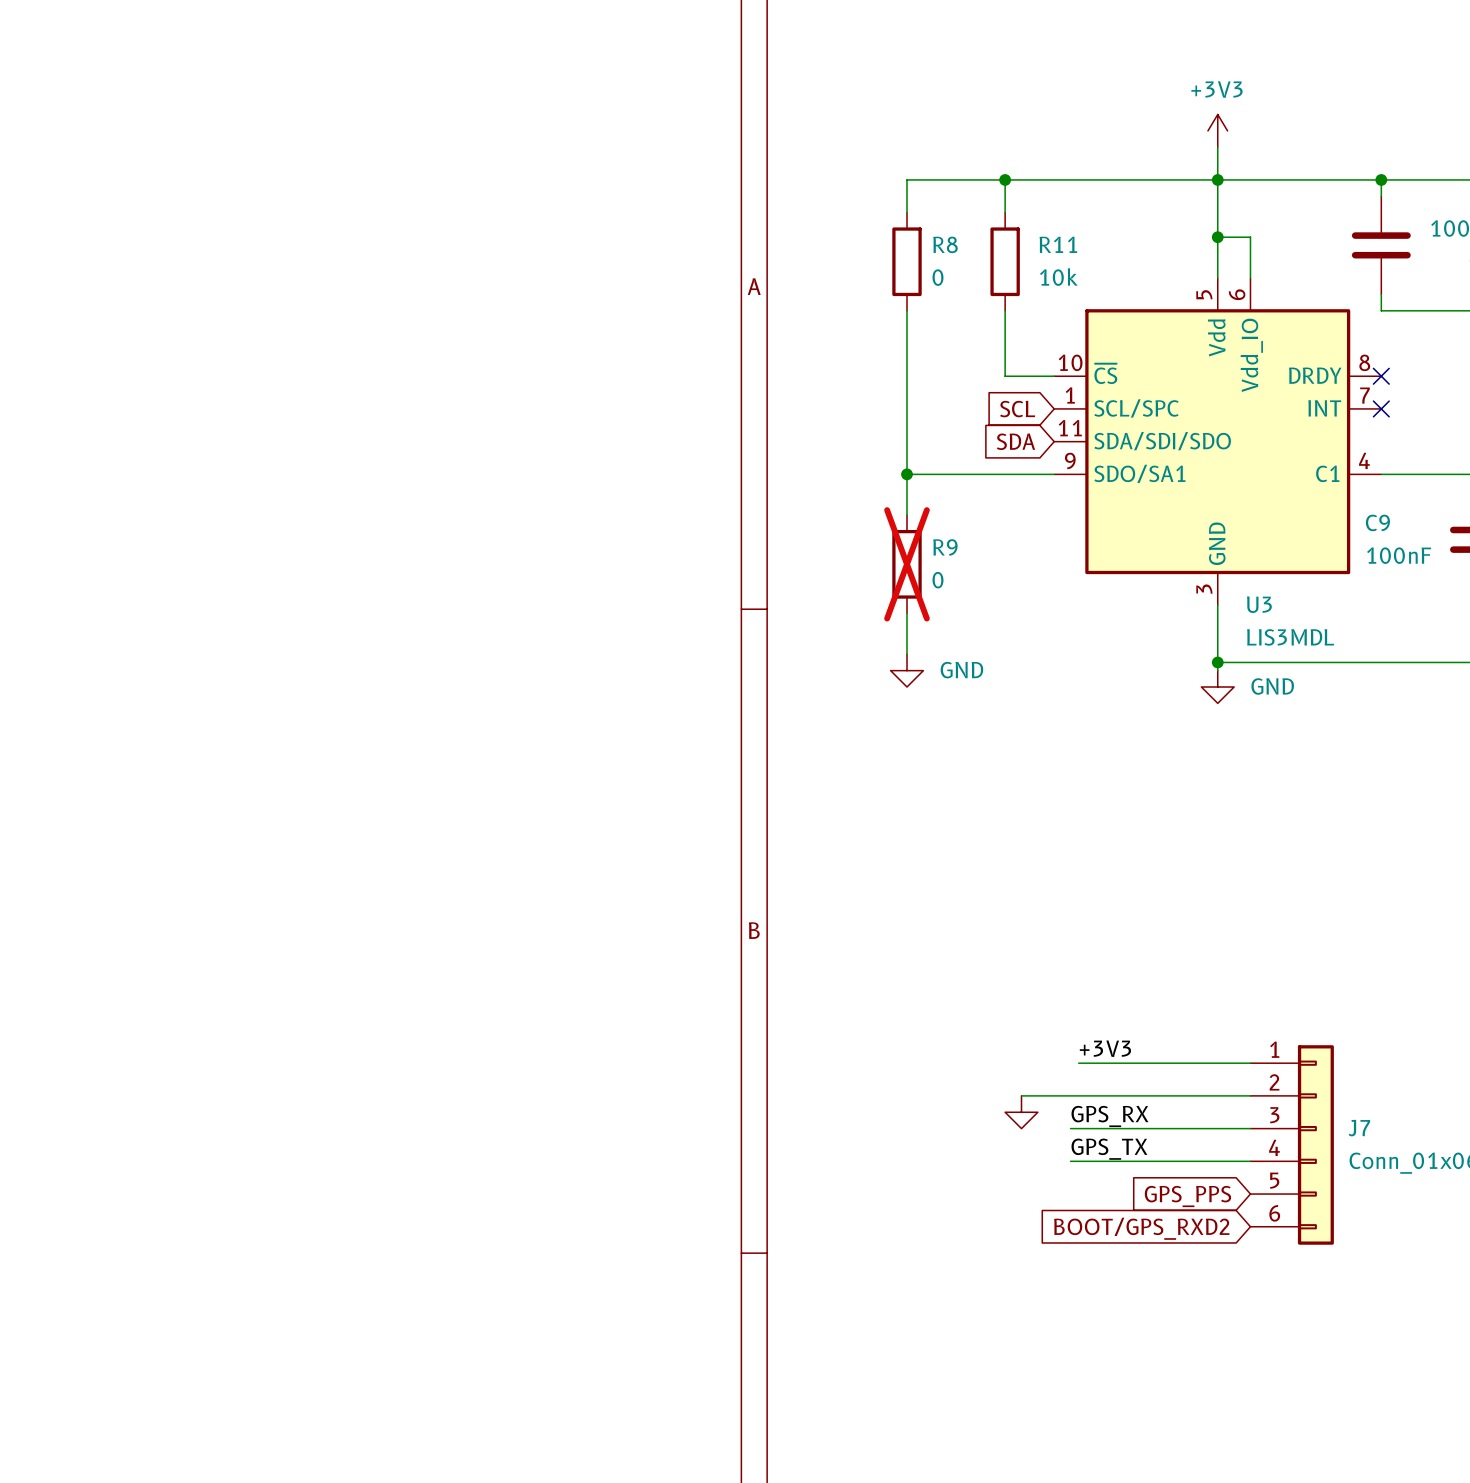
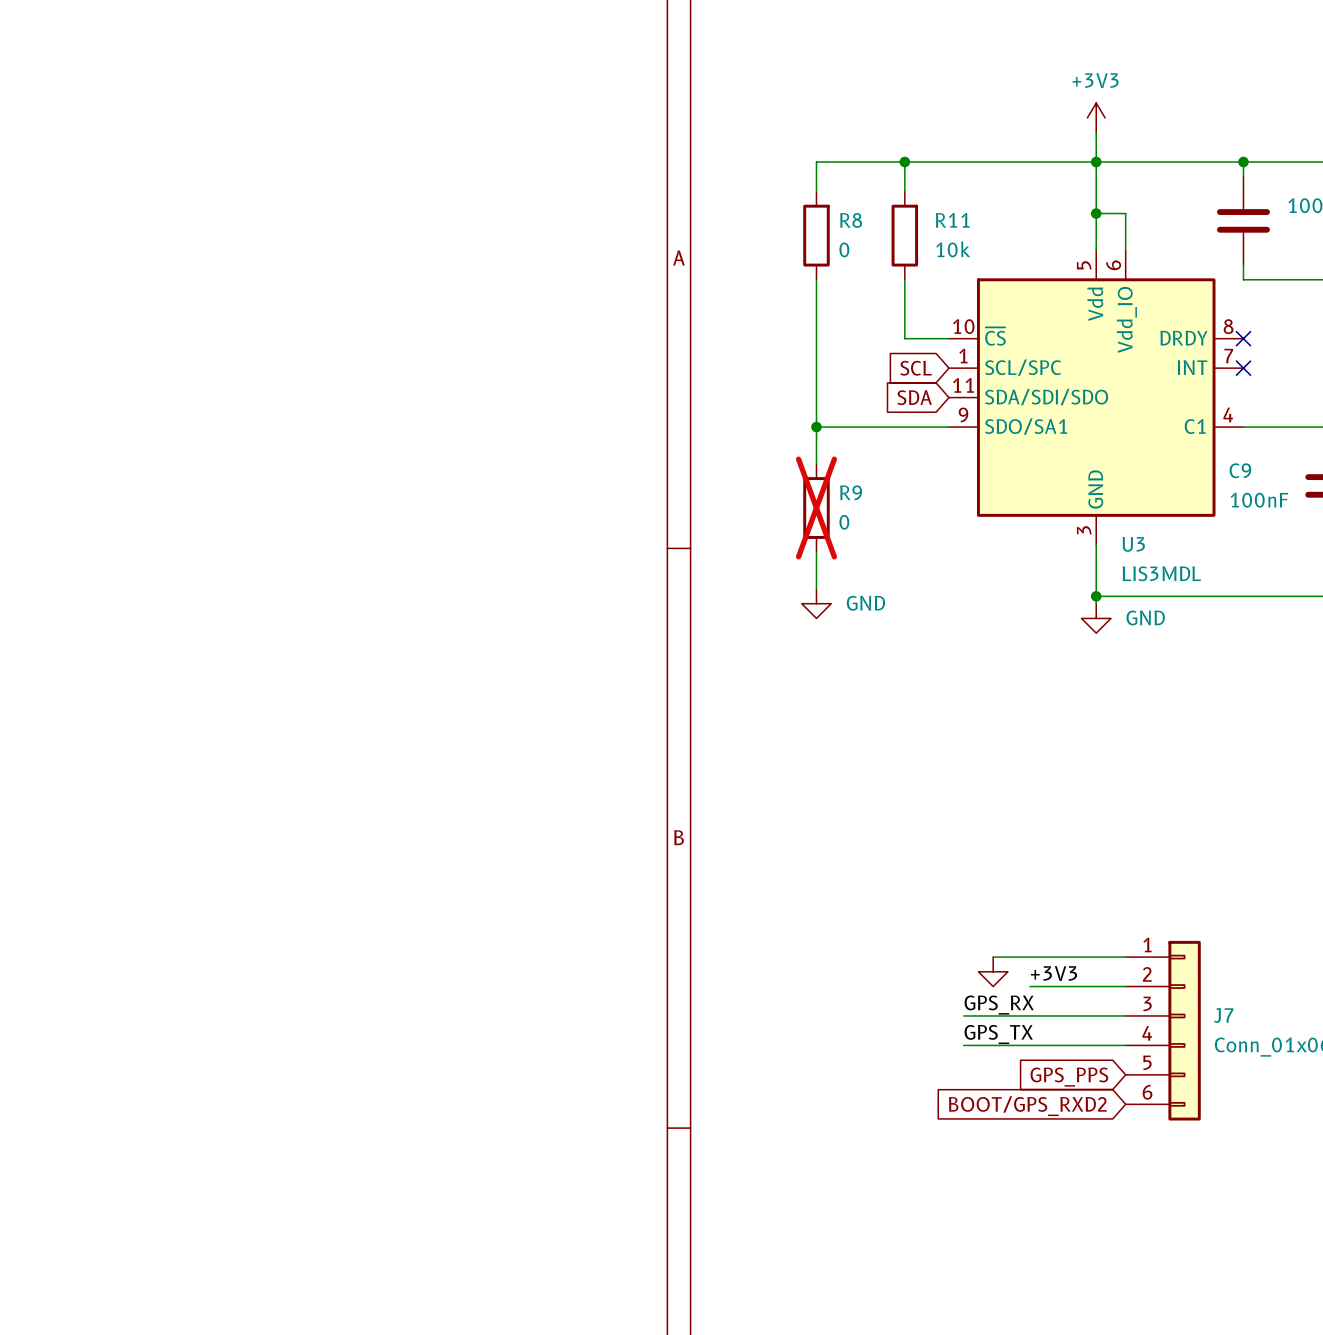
label position: +3V3 (1105, 1048) -> +3V3 (1053, 973)
wire: (1078, 1063) (1103, 1063) -> none
wire: (1021, 1095) (1144, 1095) -> none
power symbol position: (1021, 1112) -> (993, 971)

